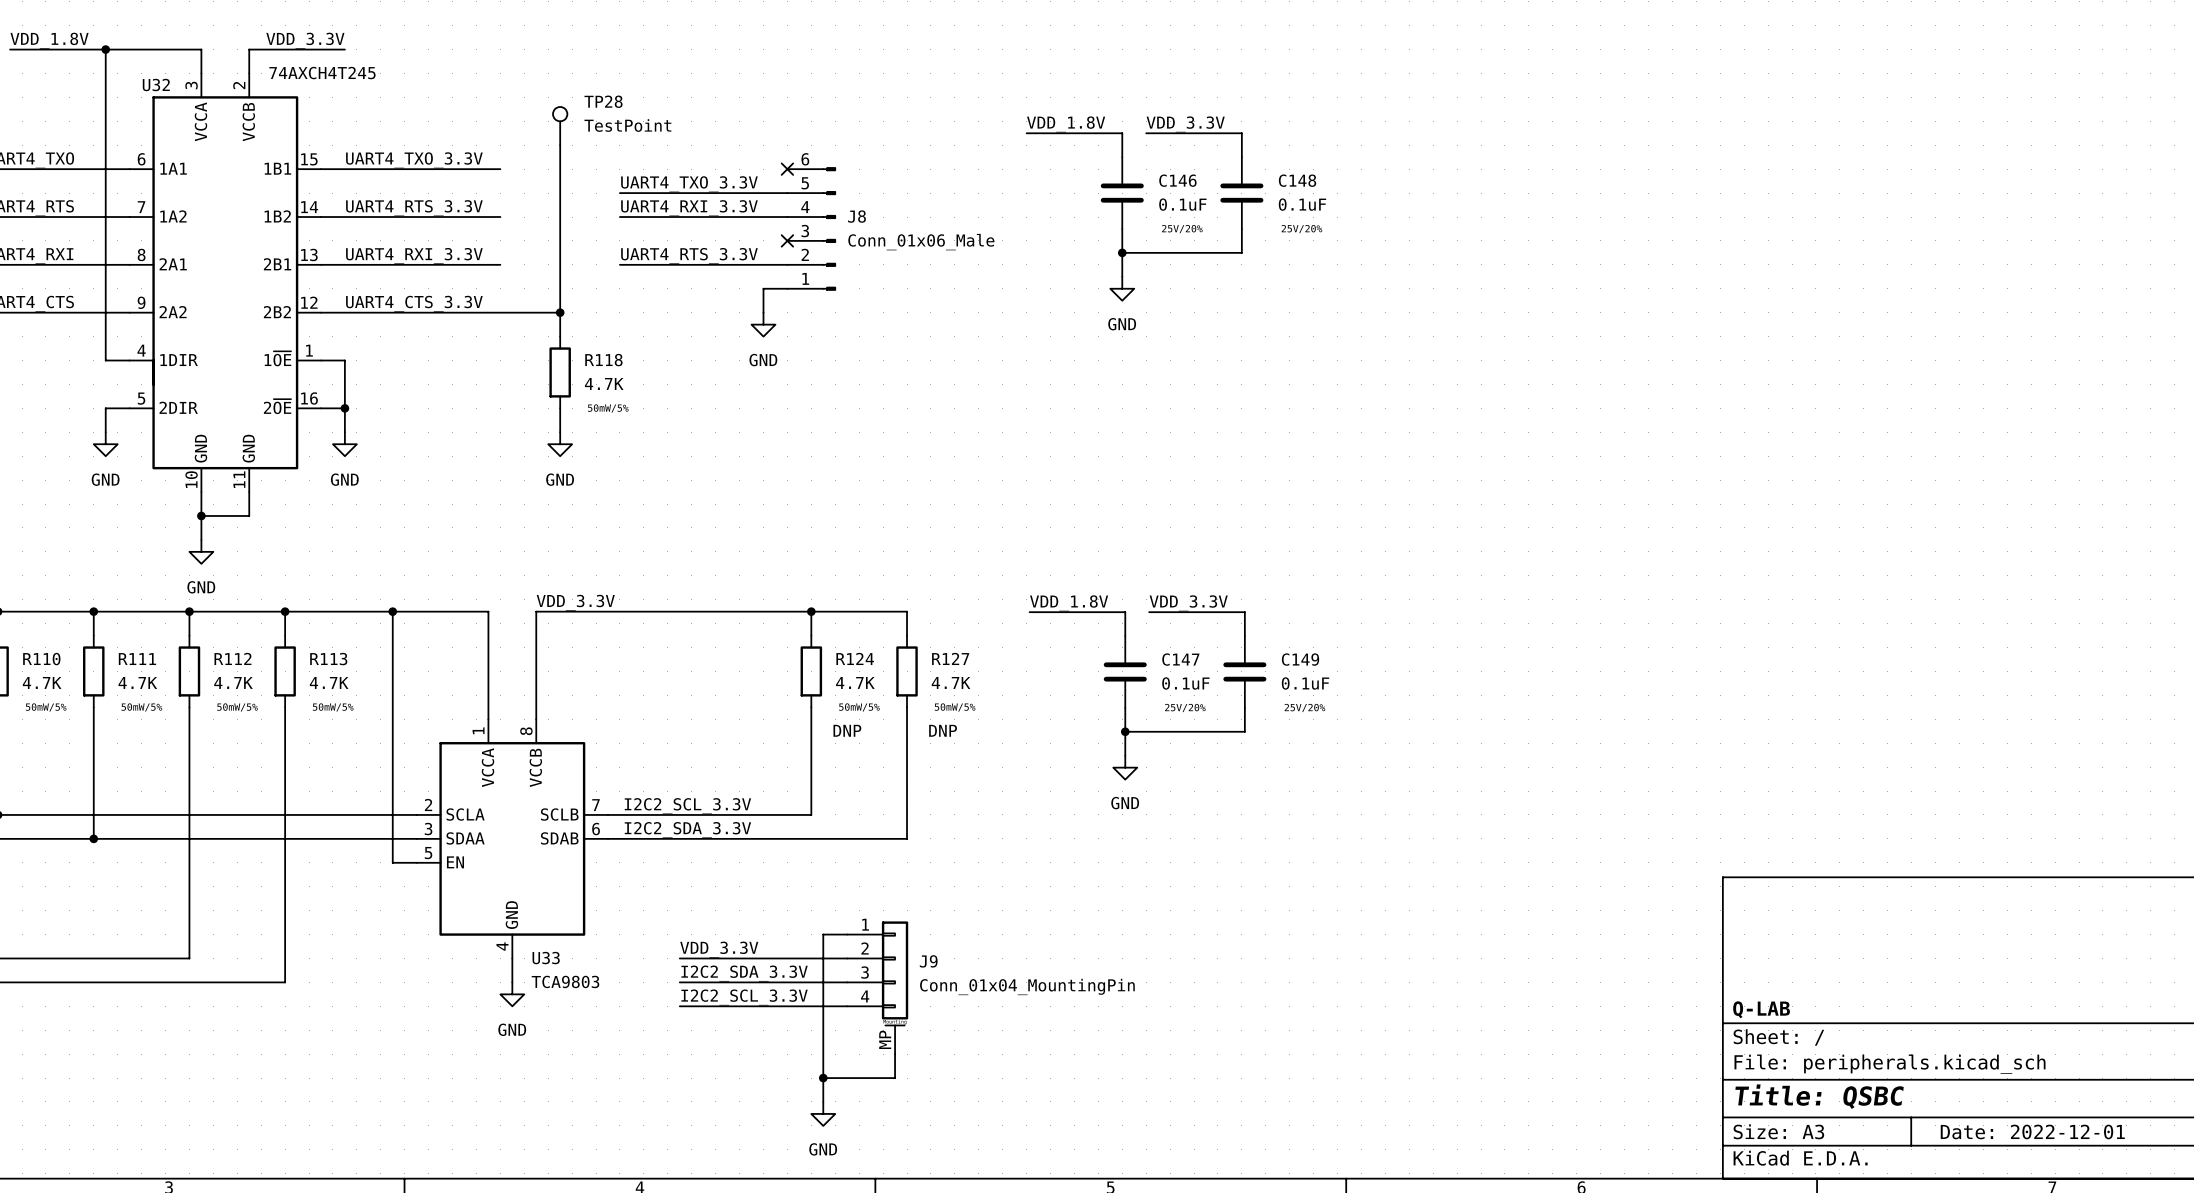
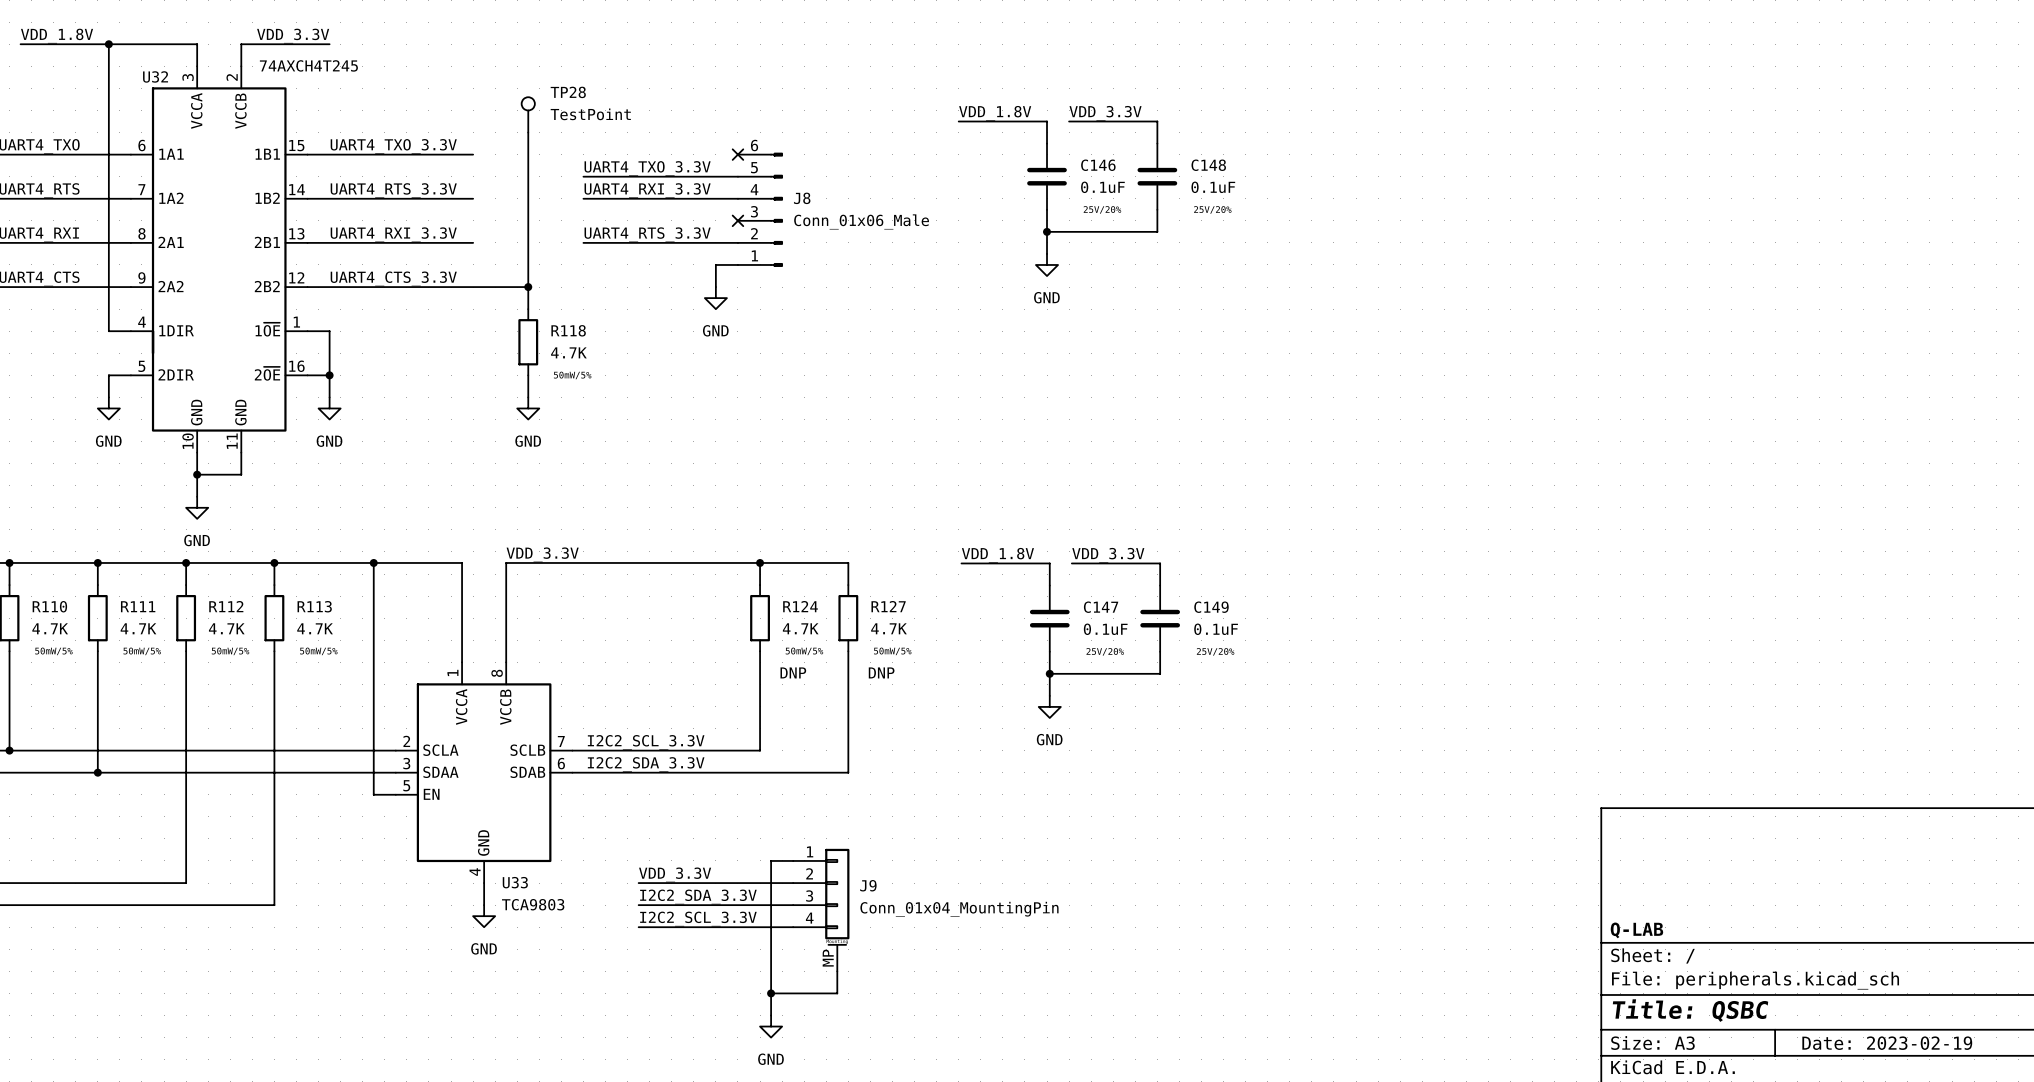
title block: Date: 2022-12-01 (2032, 1131) -> Date: 2023-02-19 (1887, 1043)

